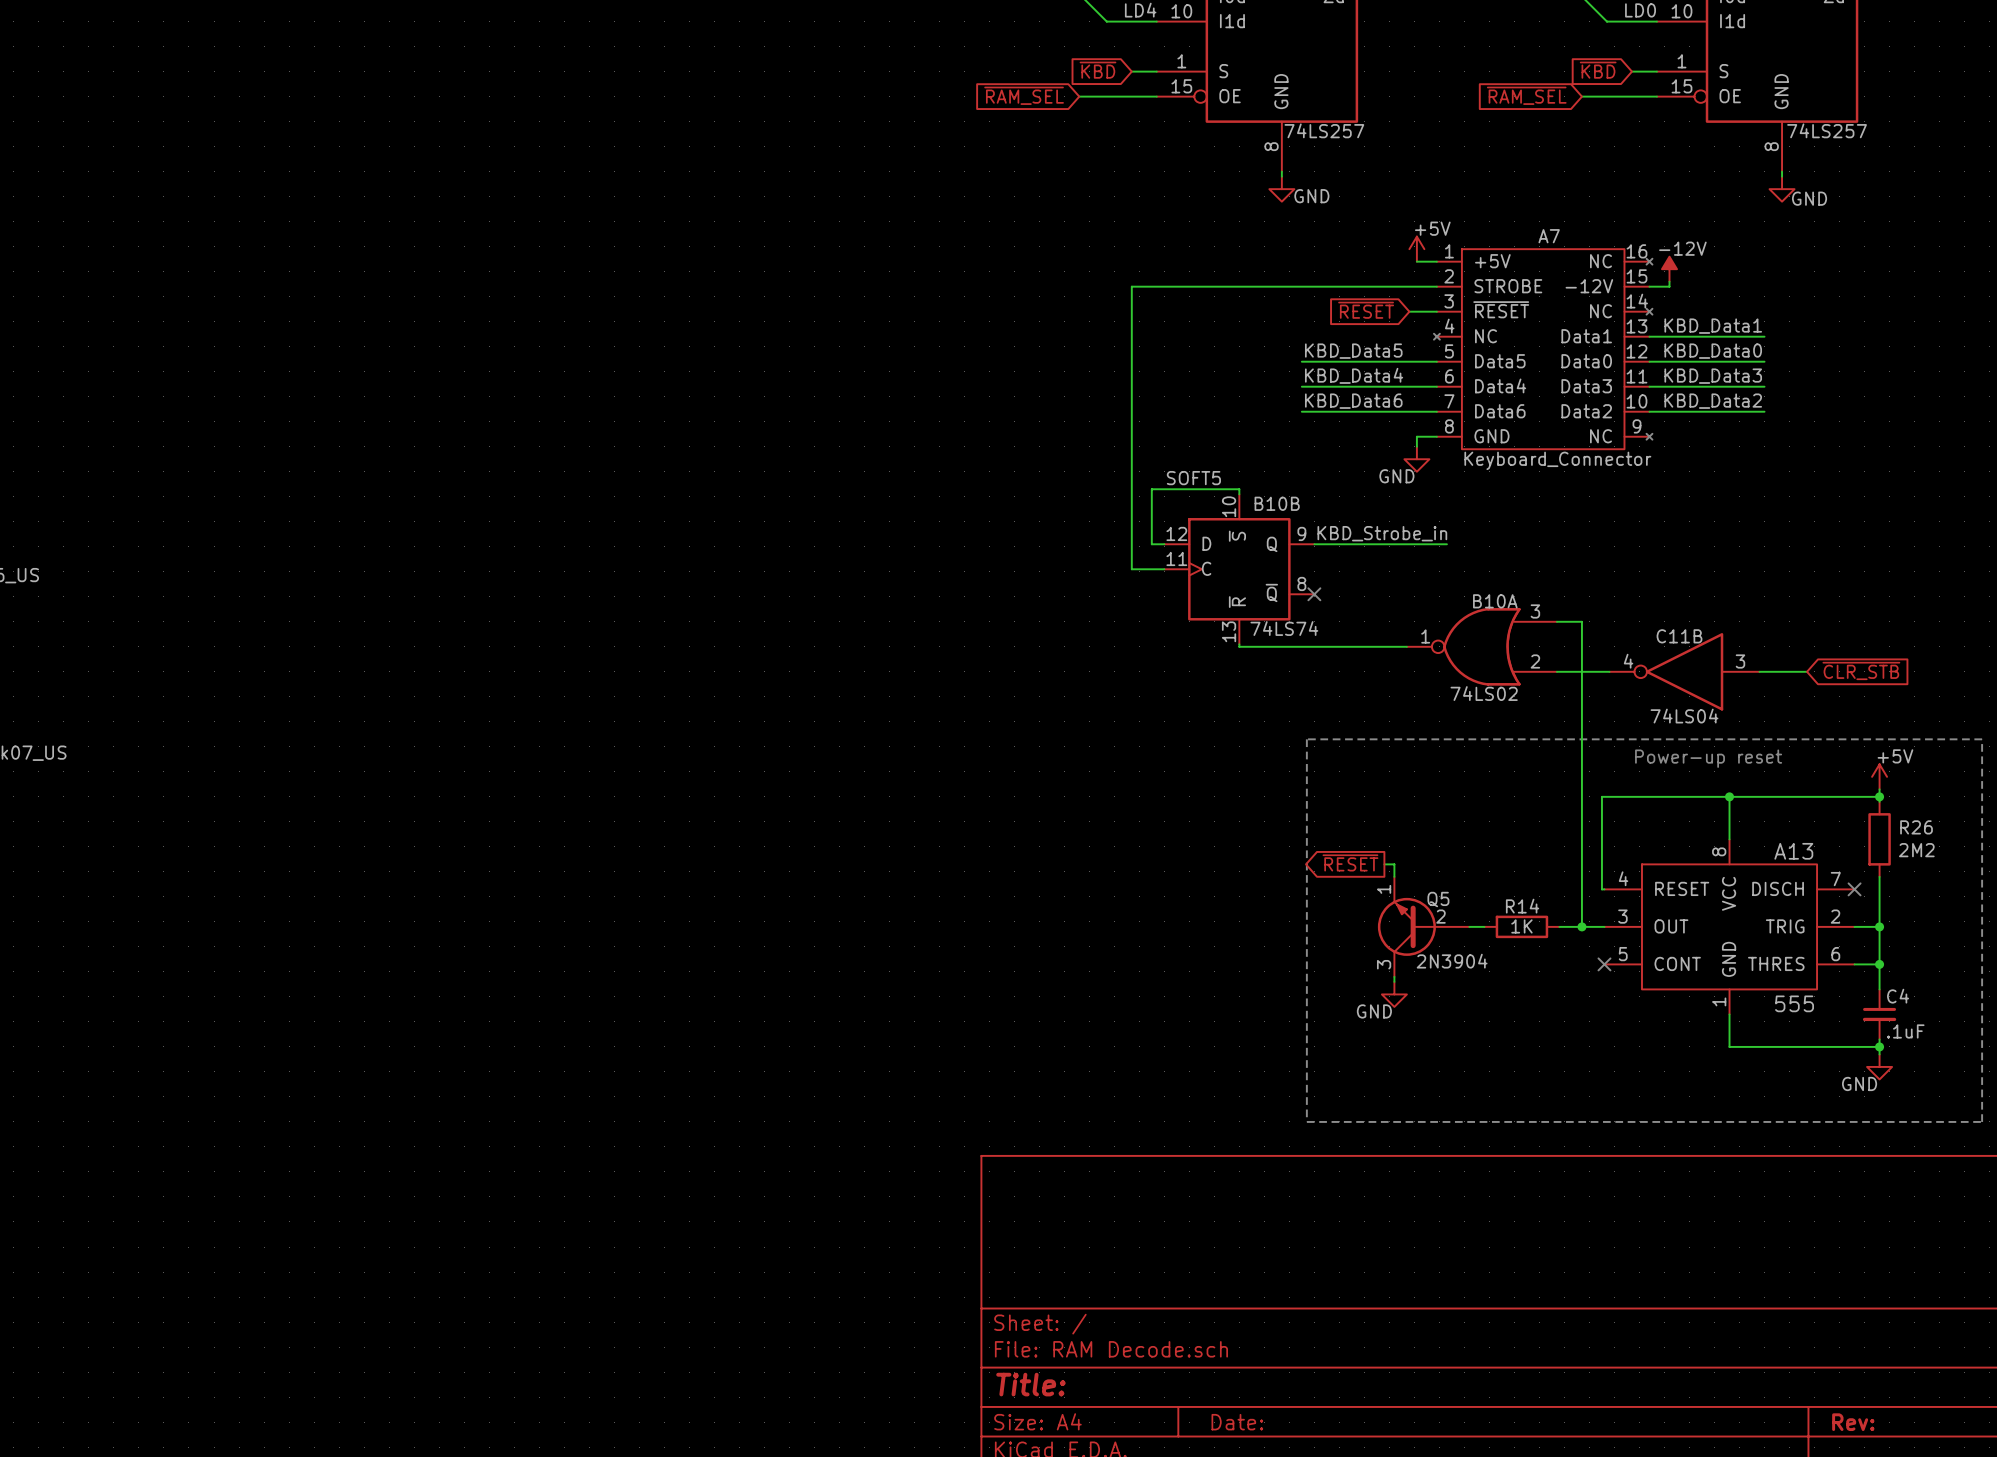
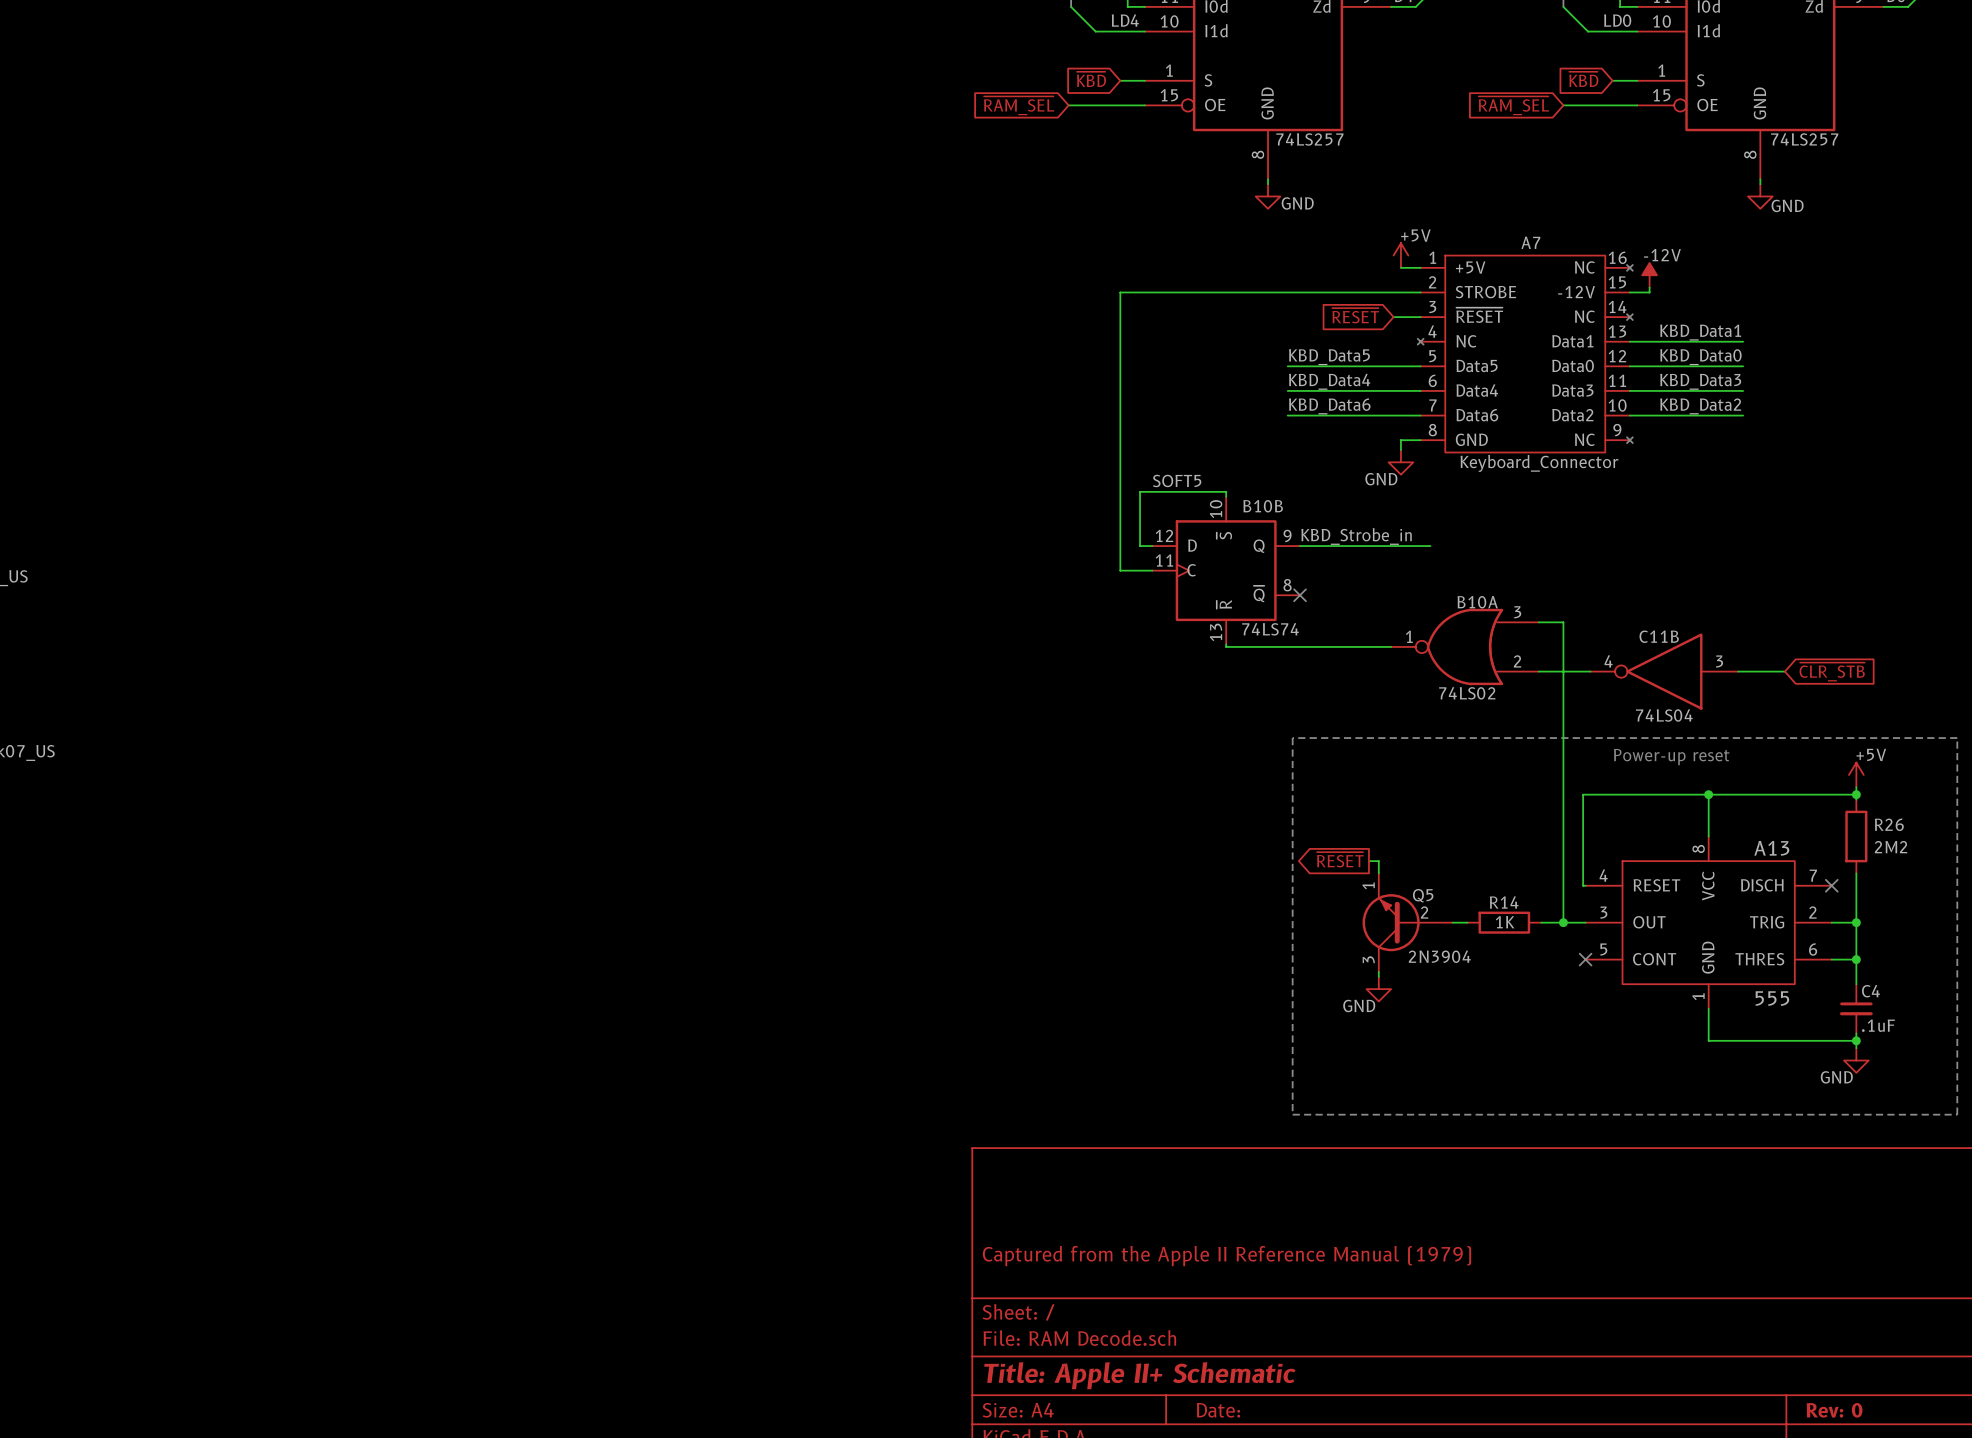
title block: none -> Captured from the Apple II Reference Manual (1979) (1227, 1256)
title block: Title: (1030, 1384) -> Title: Apple II+ Schematic (1139, 1375)
title block: Rev: (1853, 1422) -> Rev: 0 (1834, 1410)

